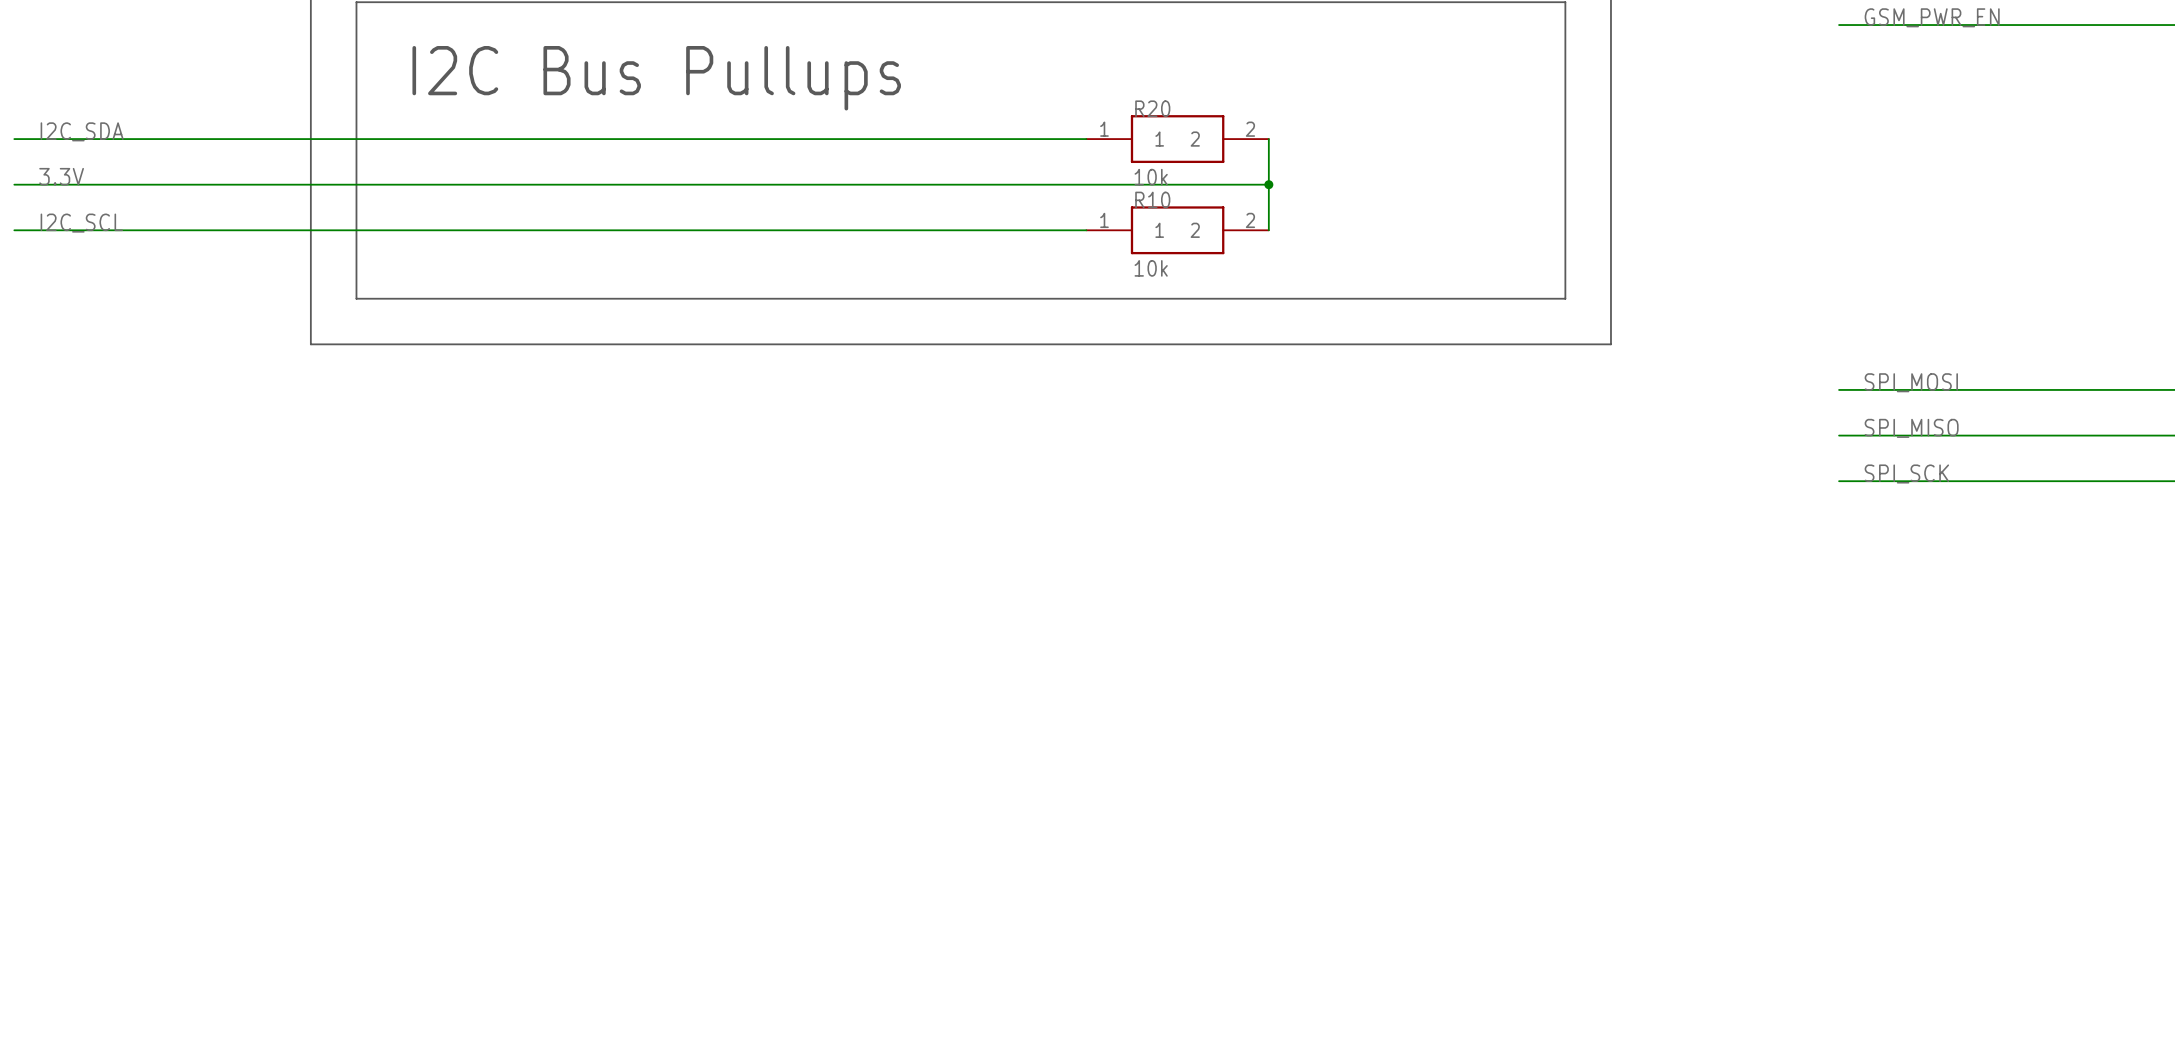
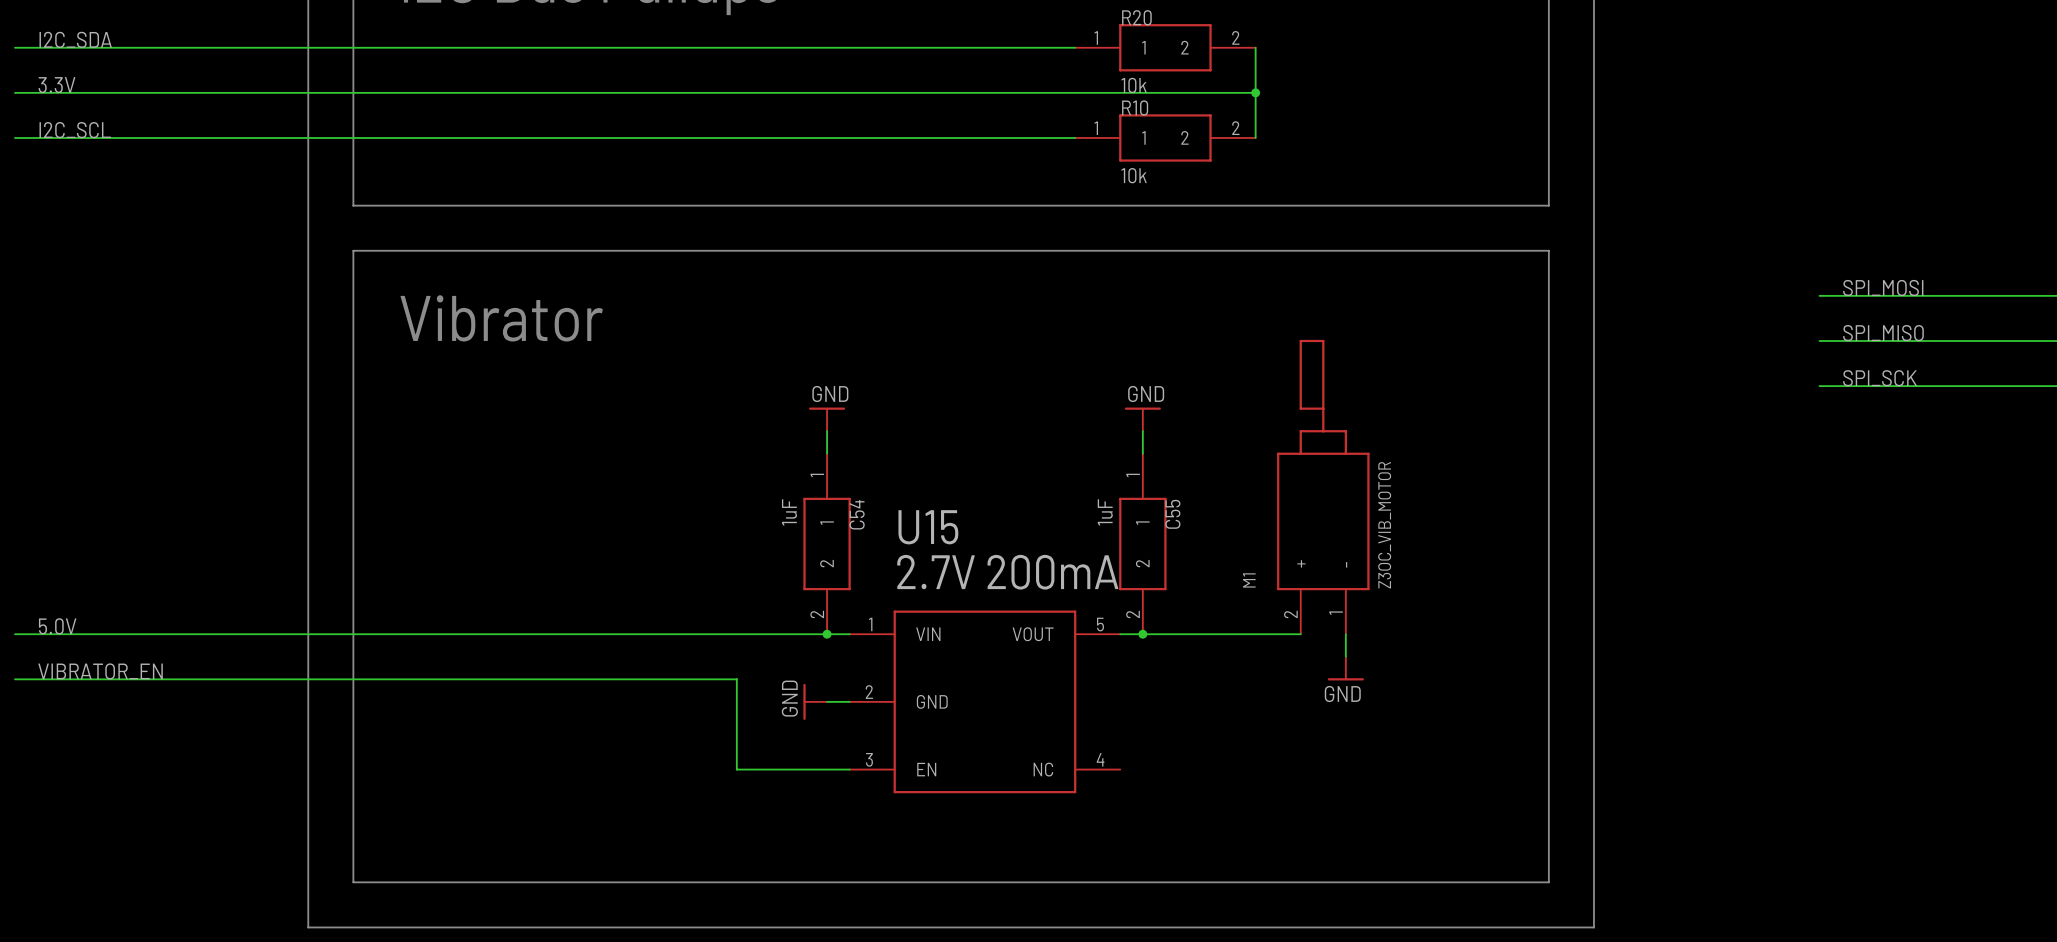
line: (310, 344) (356, 344) -> (1548, 250) (1548, 882) (353, 882) (353, 250)
line: (1565, 344) (1610, 344) -> (308, 250) (308, 927) (1593, 927) (1593, 250)
text: none -> Vibrator (501, 318)
power symbol: none -> GND (827, 419)
power symbol: none -> GND (1142, 419)
wire: none -> (827, 431) (827, 453)
wire: none -> (1142, 431) (1142, 453)
M1: none -> Z3OC_VIB_MOTOR (1323, 487)
C54: none -> 1uF (827, 543)
C55: none -> 1uF (1142, 543)
label: none -> 5.0V (57, 626)
wire: none -> (15, 634) (849, 634)
junction: none -> (827, 634)
wire: none -> (1120, 634) (1300, 634)
junction: none -> (1142, 634)
wire: none -> (1345, 634) (1345, 656)
power symbol: none -> GND (1345, 668)
label: none -> VIBRATOR_EN (100, 671)
wire: none -> (15, 679) (736, 679) (736, 769) (849, 769)
power symbol: none -> GND (815, 701)
wire: none -> (827, 701) (849, 701)
U15: none -> 2.7V 200mA (984, 701)

